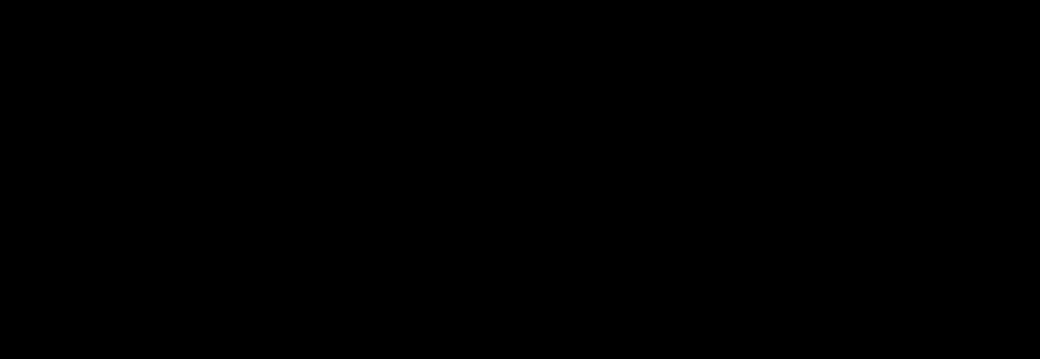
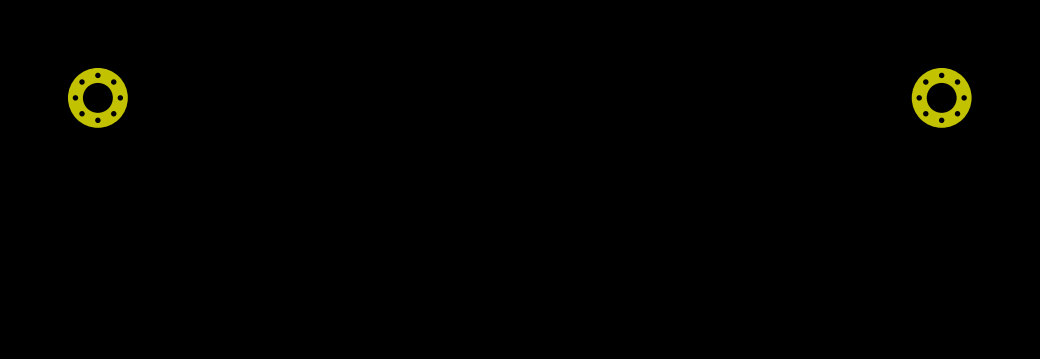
part: none -> (97, 97)
part: none -> (941, 97)

